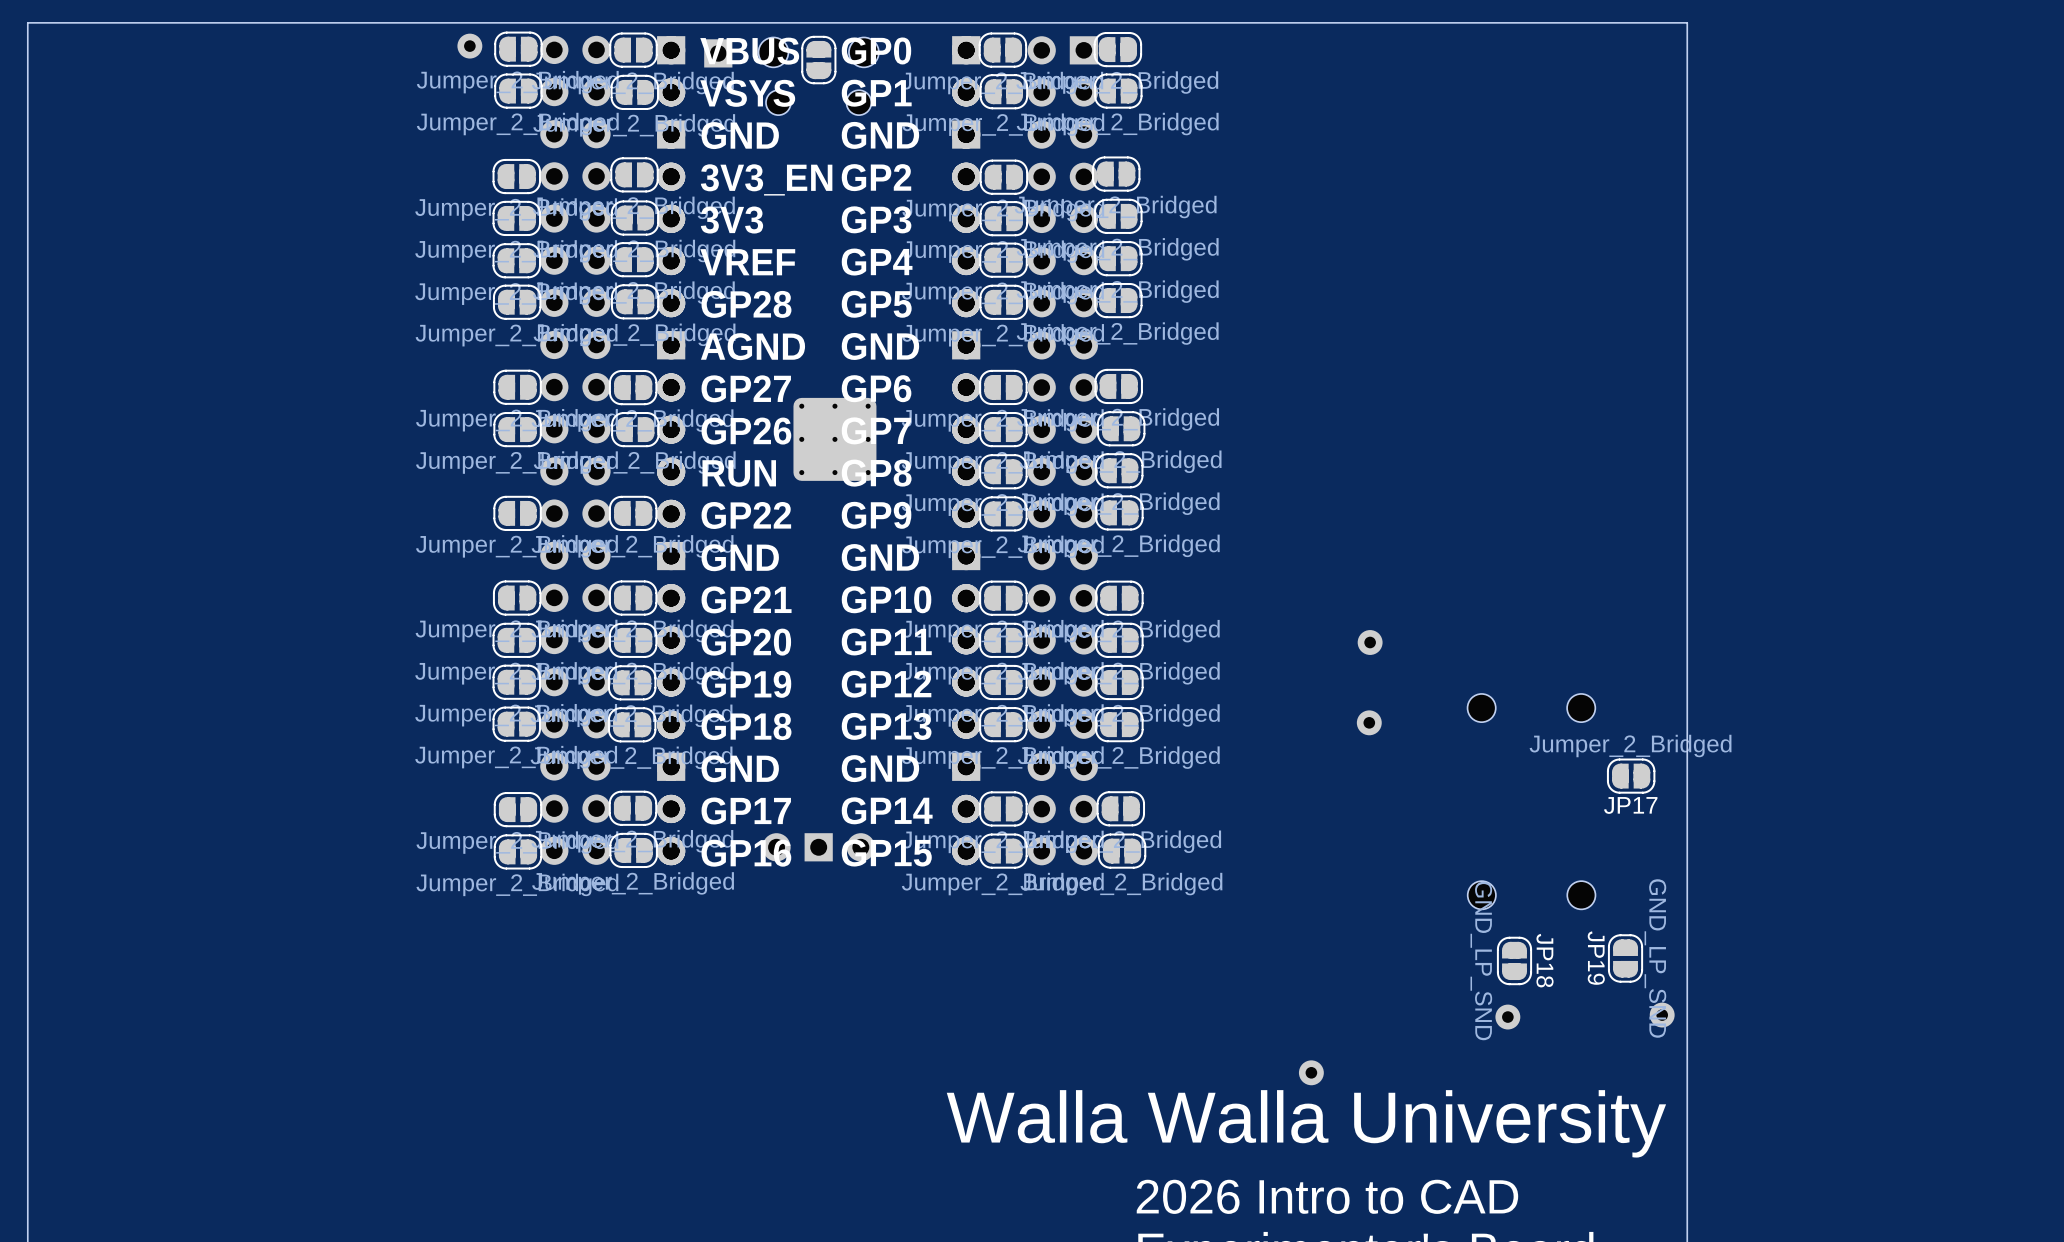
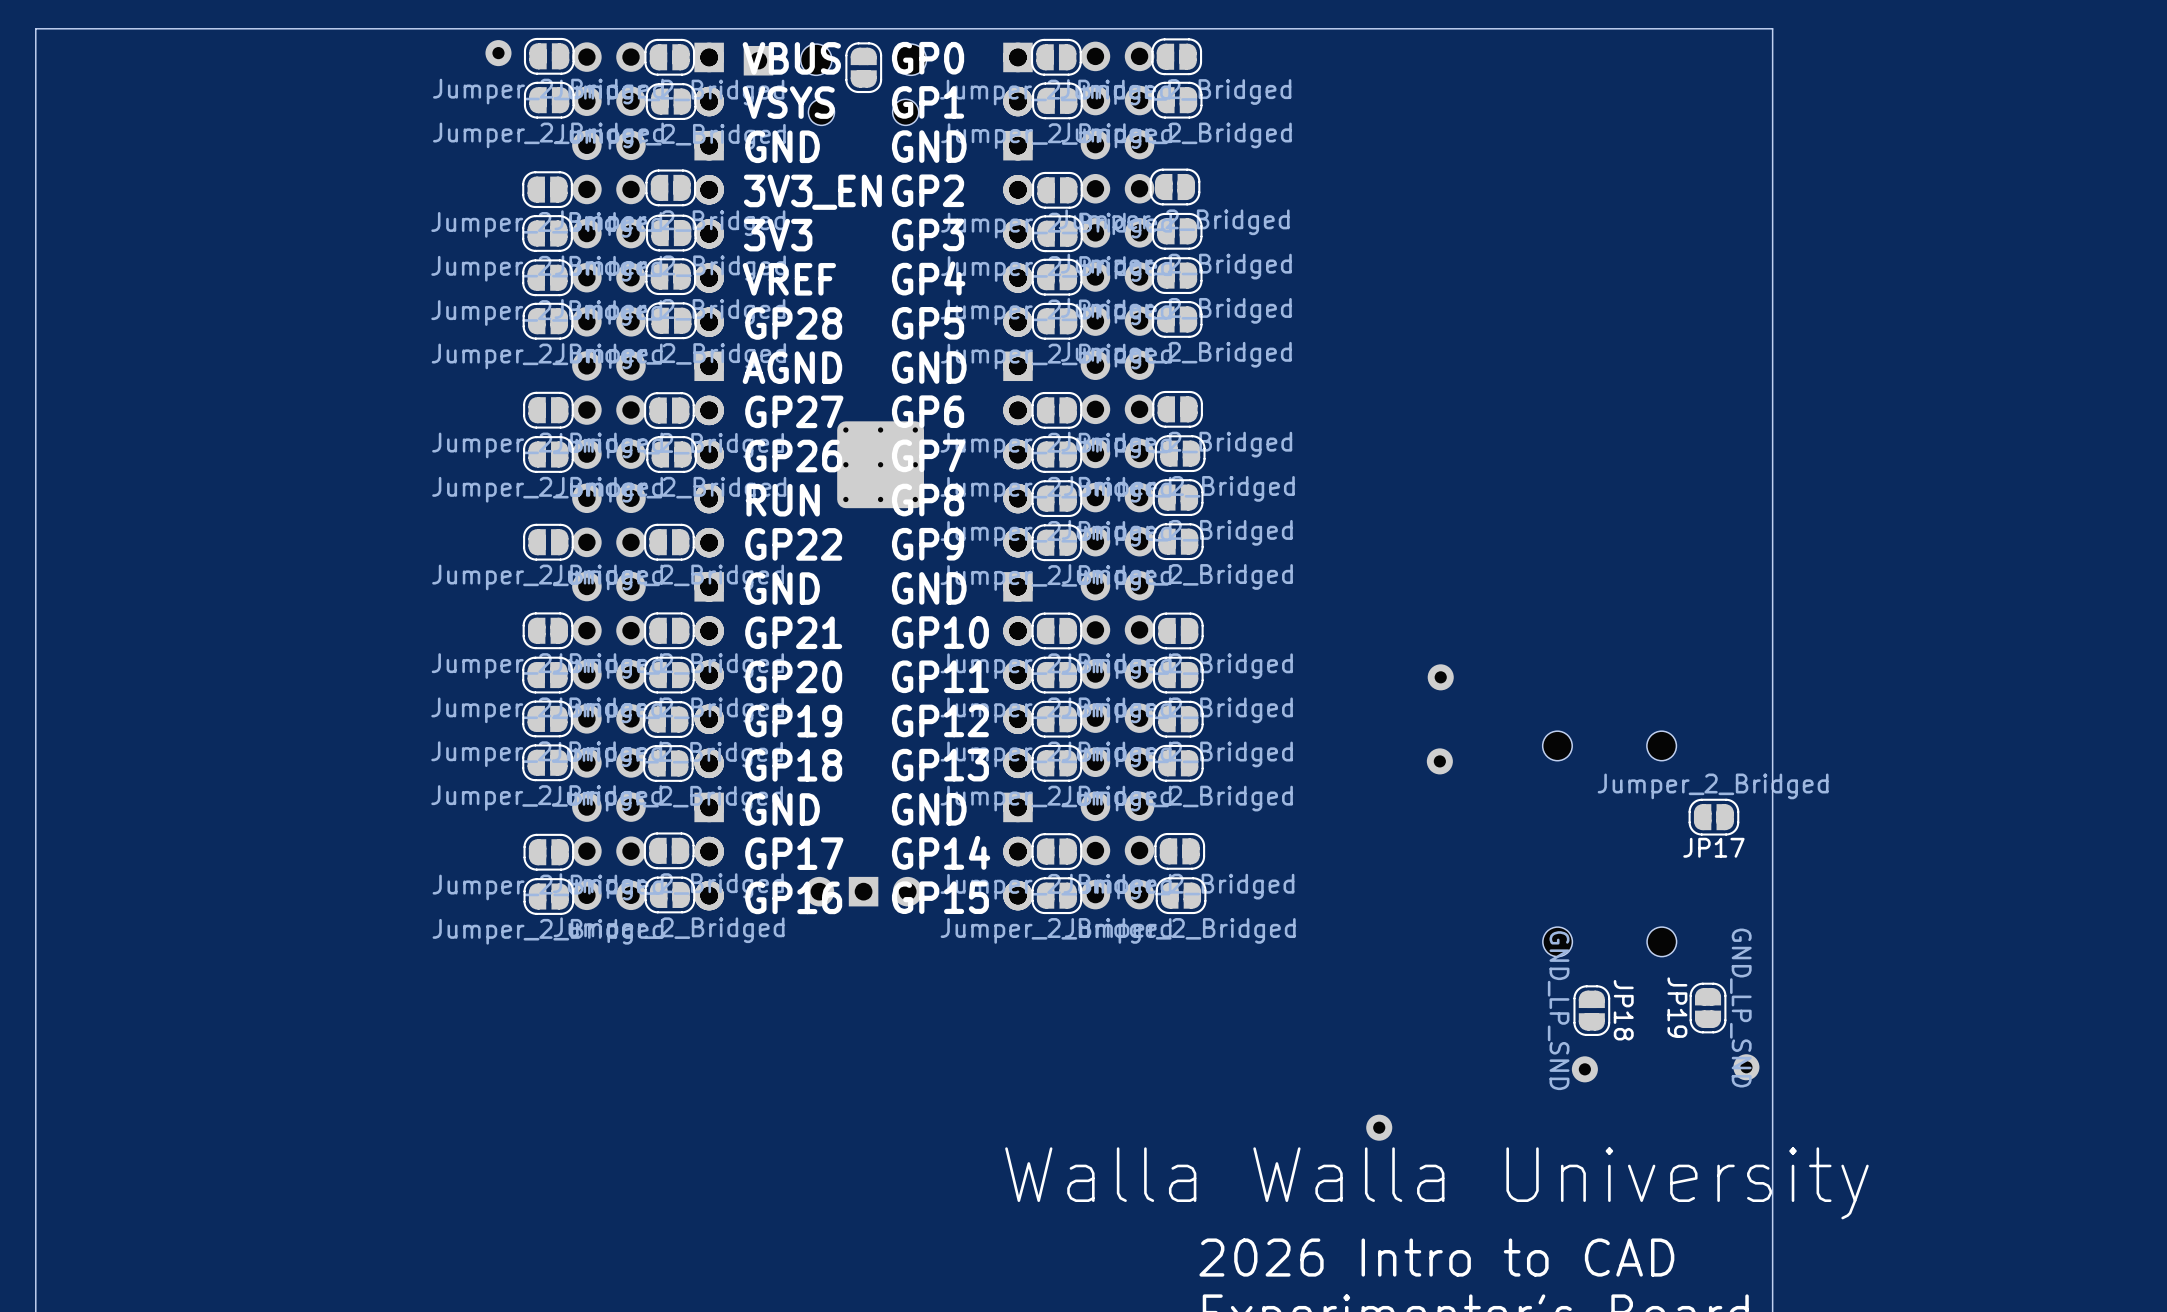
part footprint: [1027, 36, 1098, 866] -> [1080, 41, 1155, 910]

